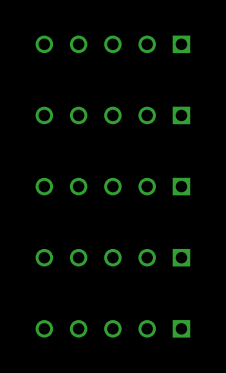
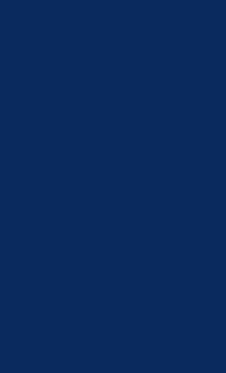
part: (112, 44) -> none
part: (112, 115) -> none
part: (112, 186) -> none
part: (112, 257) -> none
part: (112, 328) -> none

